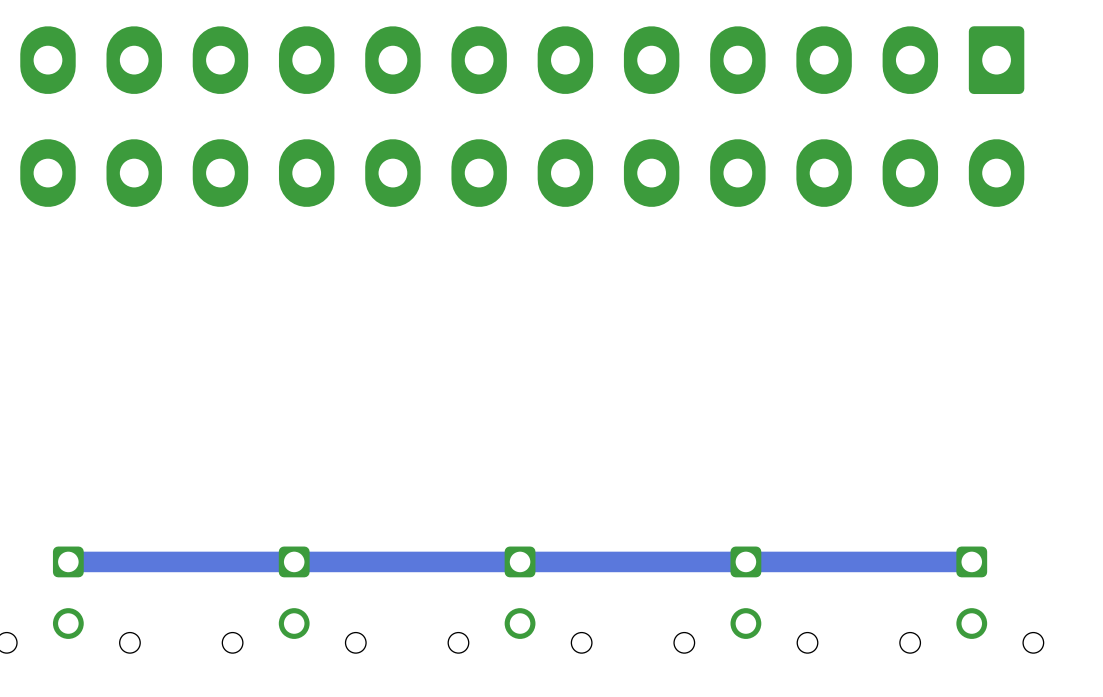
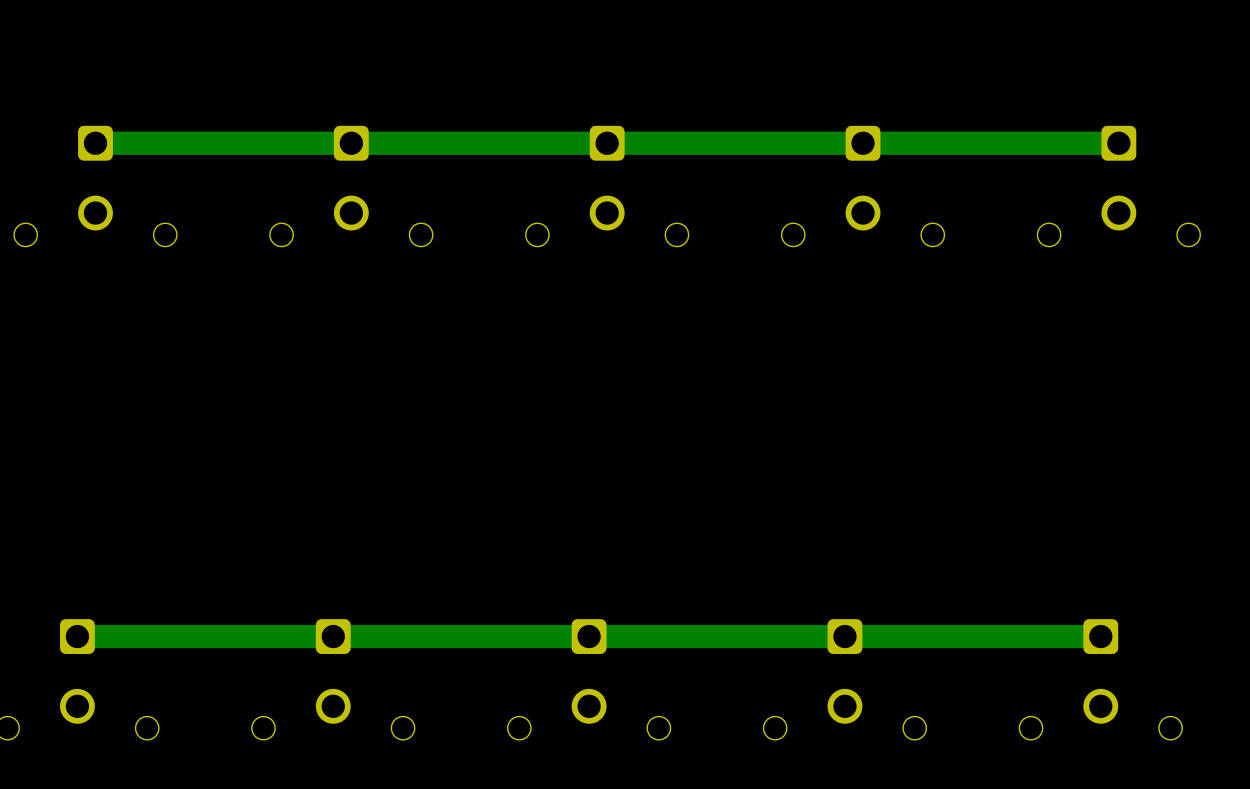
part: (522, 116) -> none
track: none -> (1118, 143) (95, 143)
part: none -> (95, 186)
part: none -> (351, 186)
part: none -> (607, 186)
part: none -> (863, 186)
part: none -> (1118, 186)

